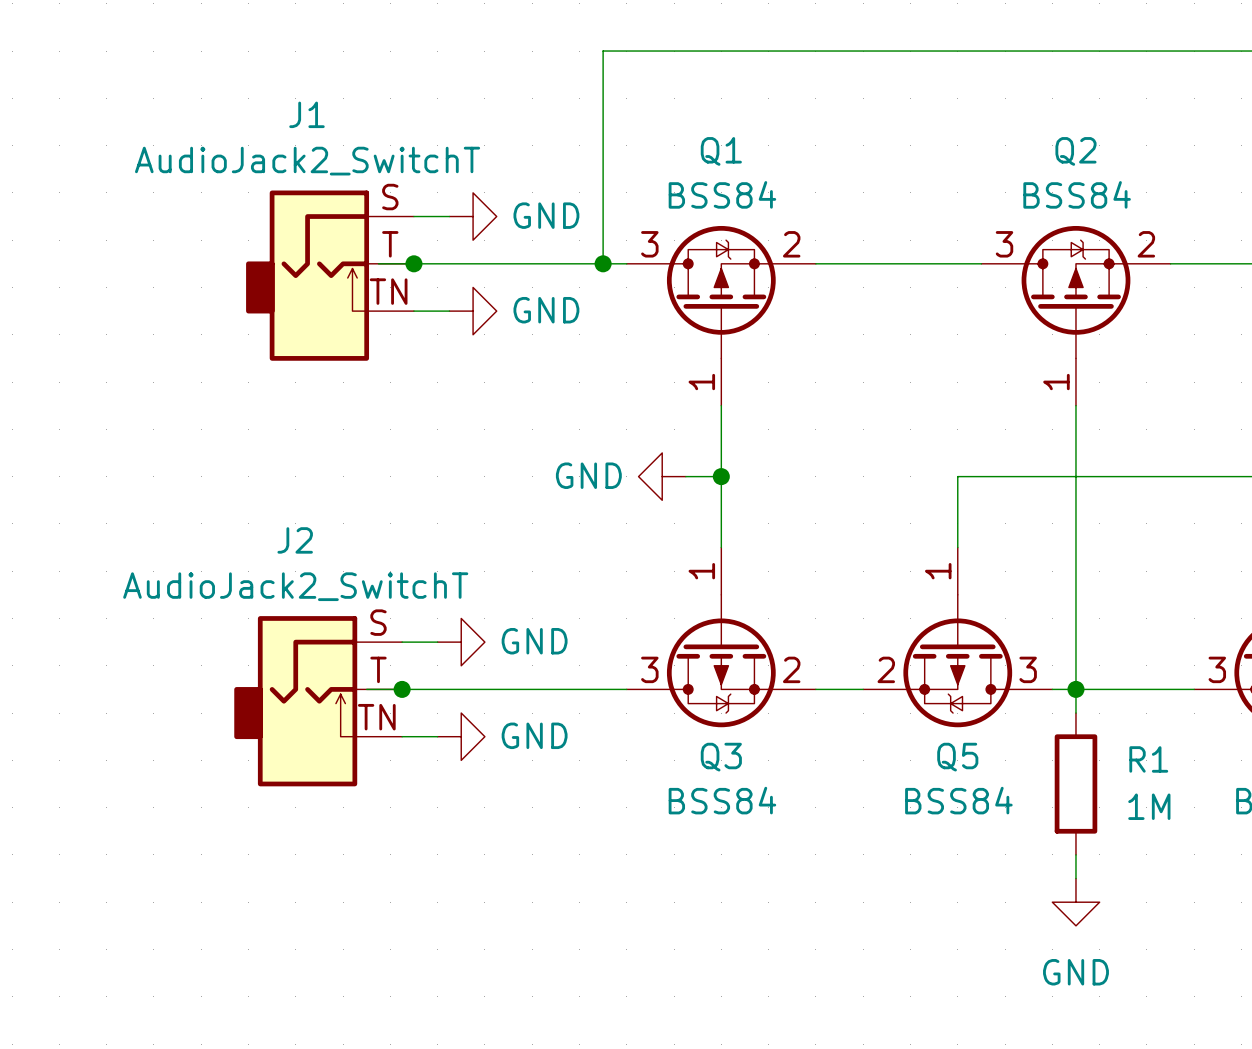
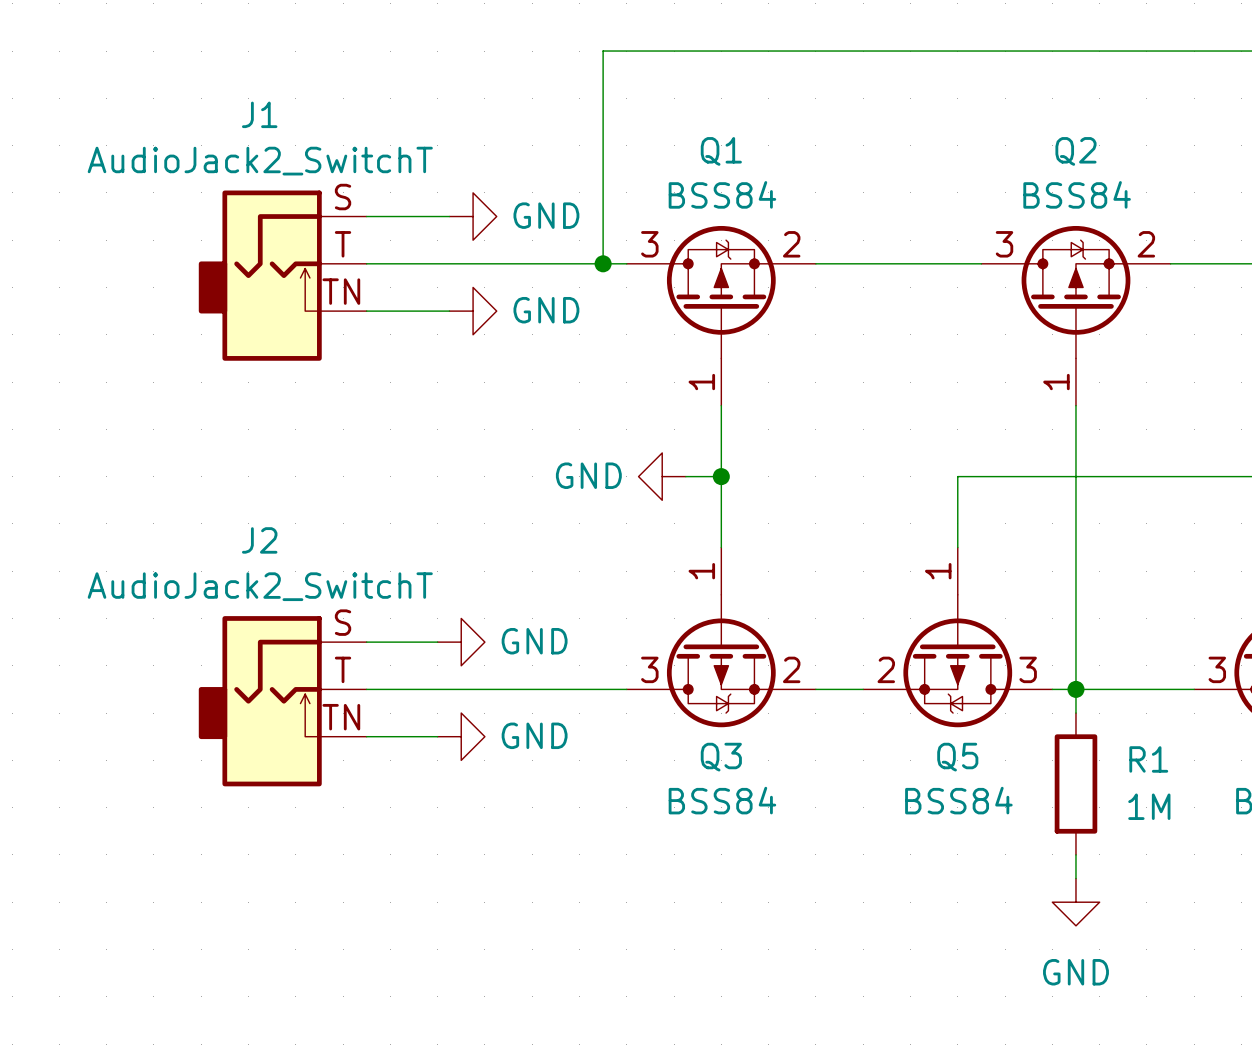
junction: (413, 263) -> none
J1 position: (330, 275) -> (282, 275)
junction: (402, 689) -> none
J2 position: (318, 701) -> (282, 701)

